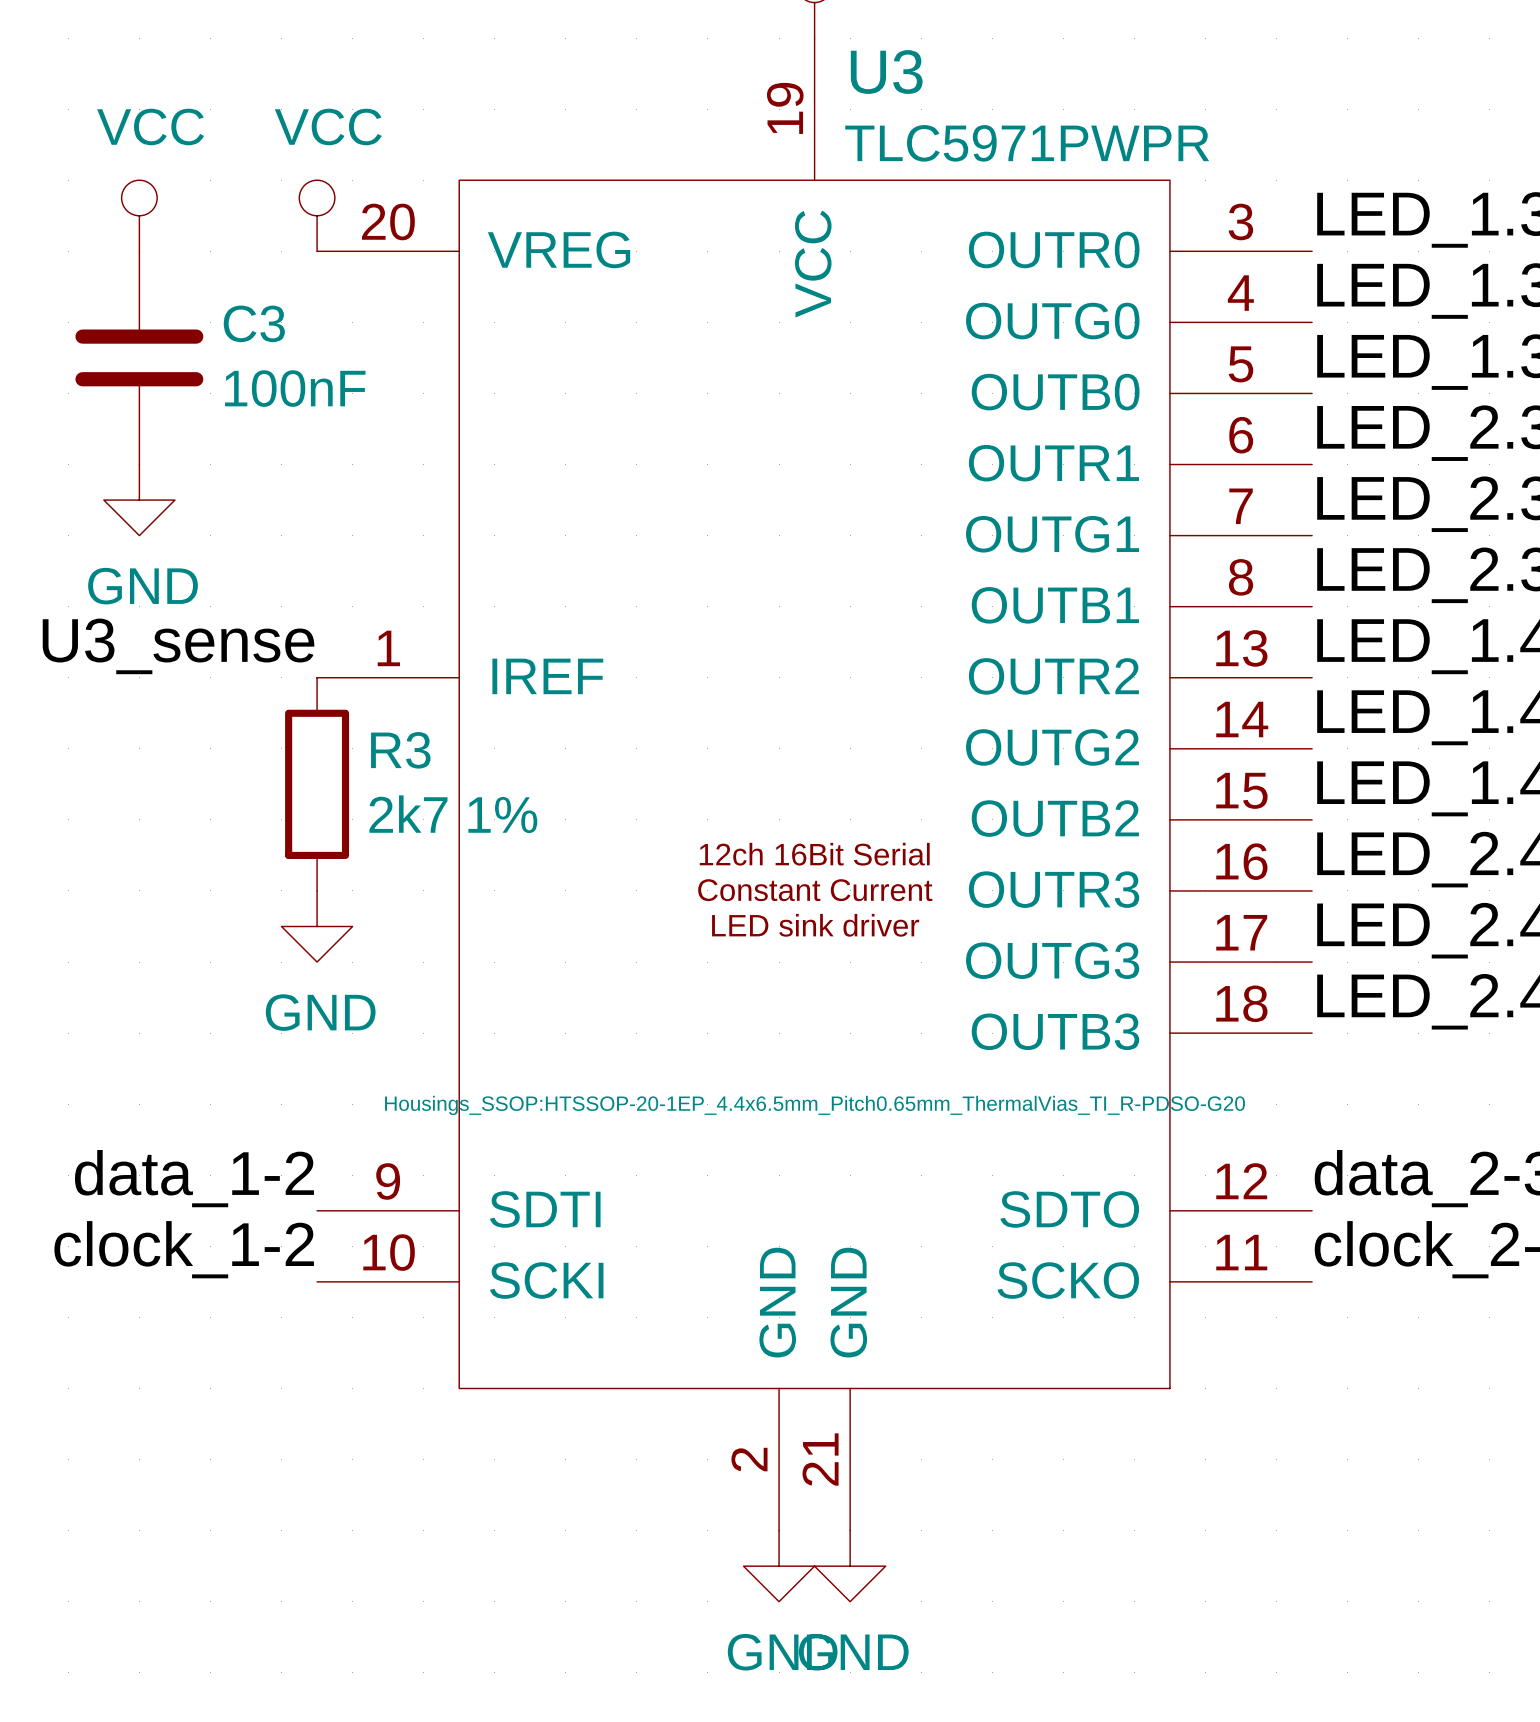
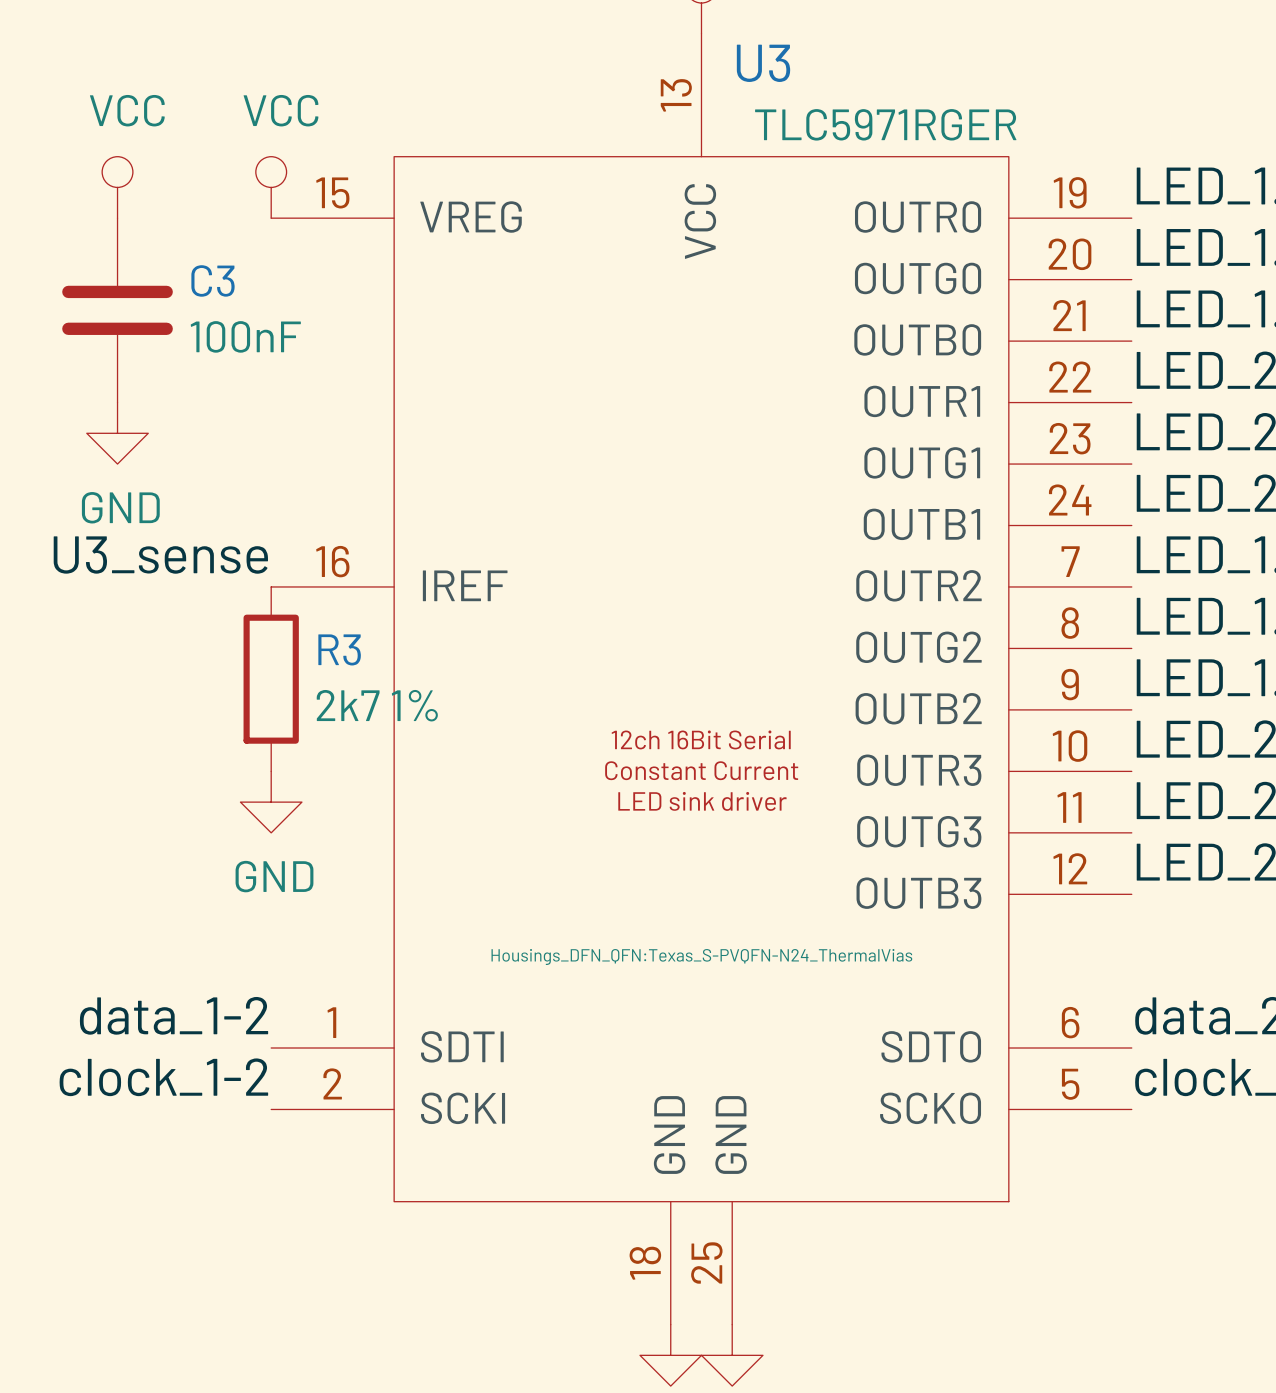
U3 symbol: [317, 38, 1313, 1531] -> [271, 33, 1132, 1325]
U3 value: TLC5971PWPR (1027, 143) -> TLC5971RGER (885, 124)
U3 text: Housings_SSOP:HTSSOP-20-1EP_4.4x6.5mm_Pitch0.65mm_ThermalVias_TI_R-PDSO-G20 (815, 1105) -> Housings_DFN_QFN:Texas_S-PVQFN-N24_ThermalVias (701, 956)

